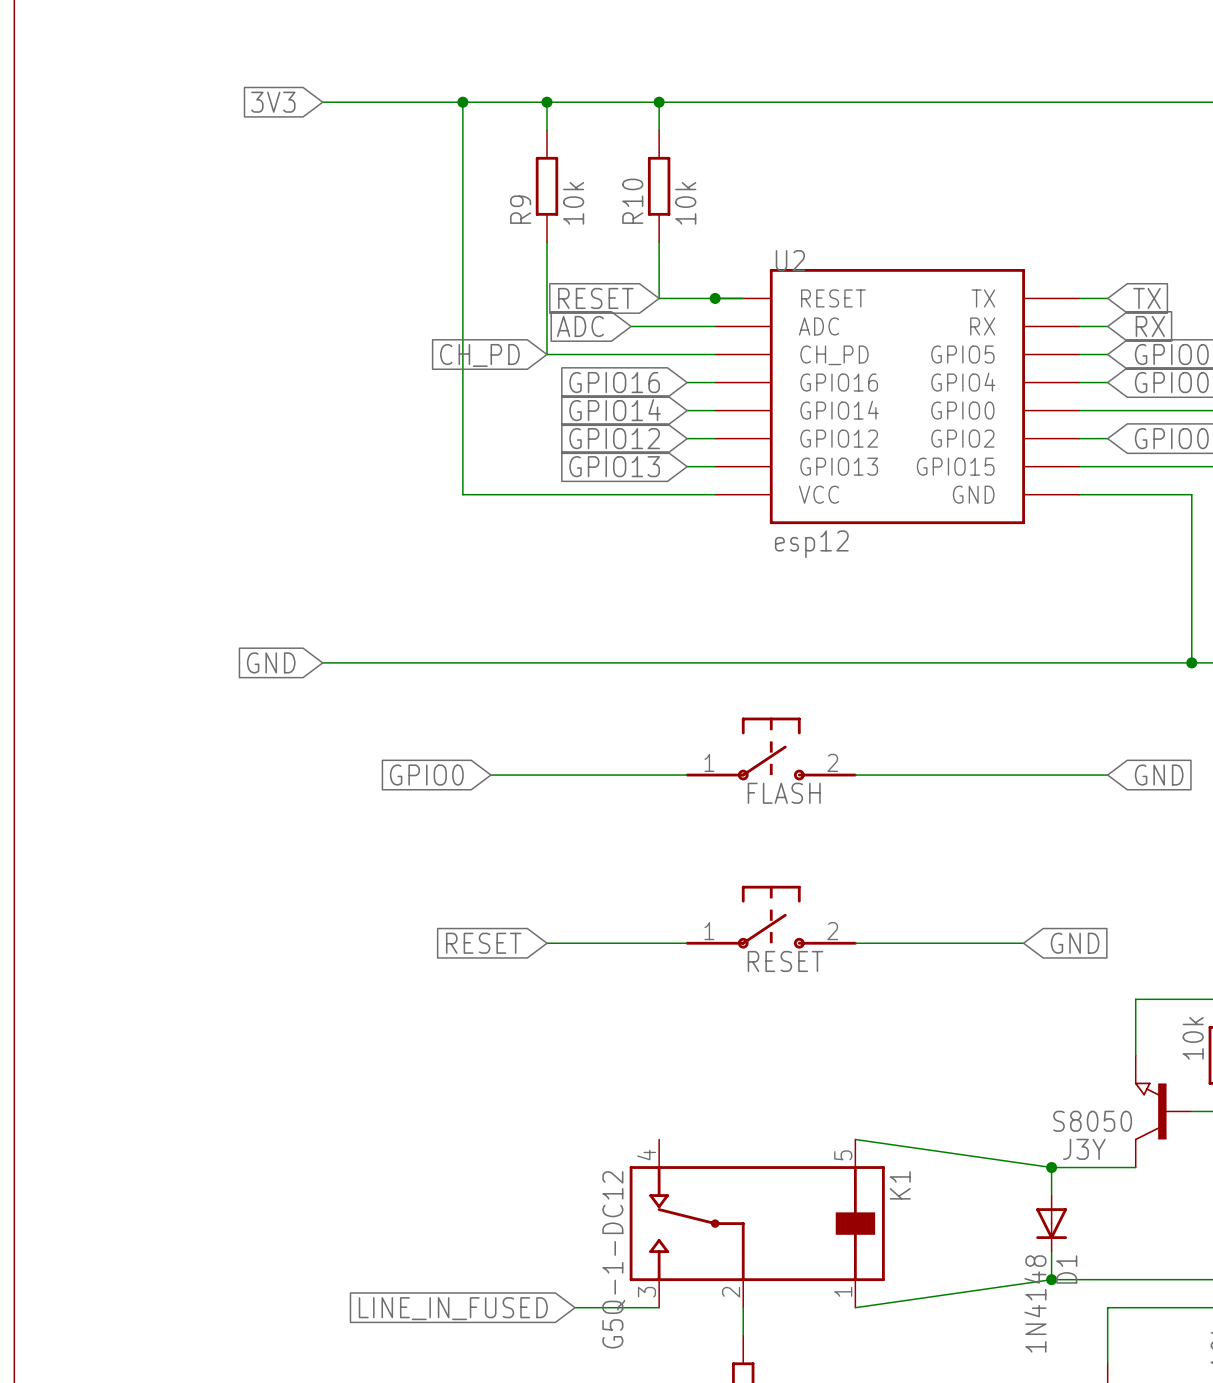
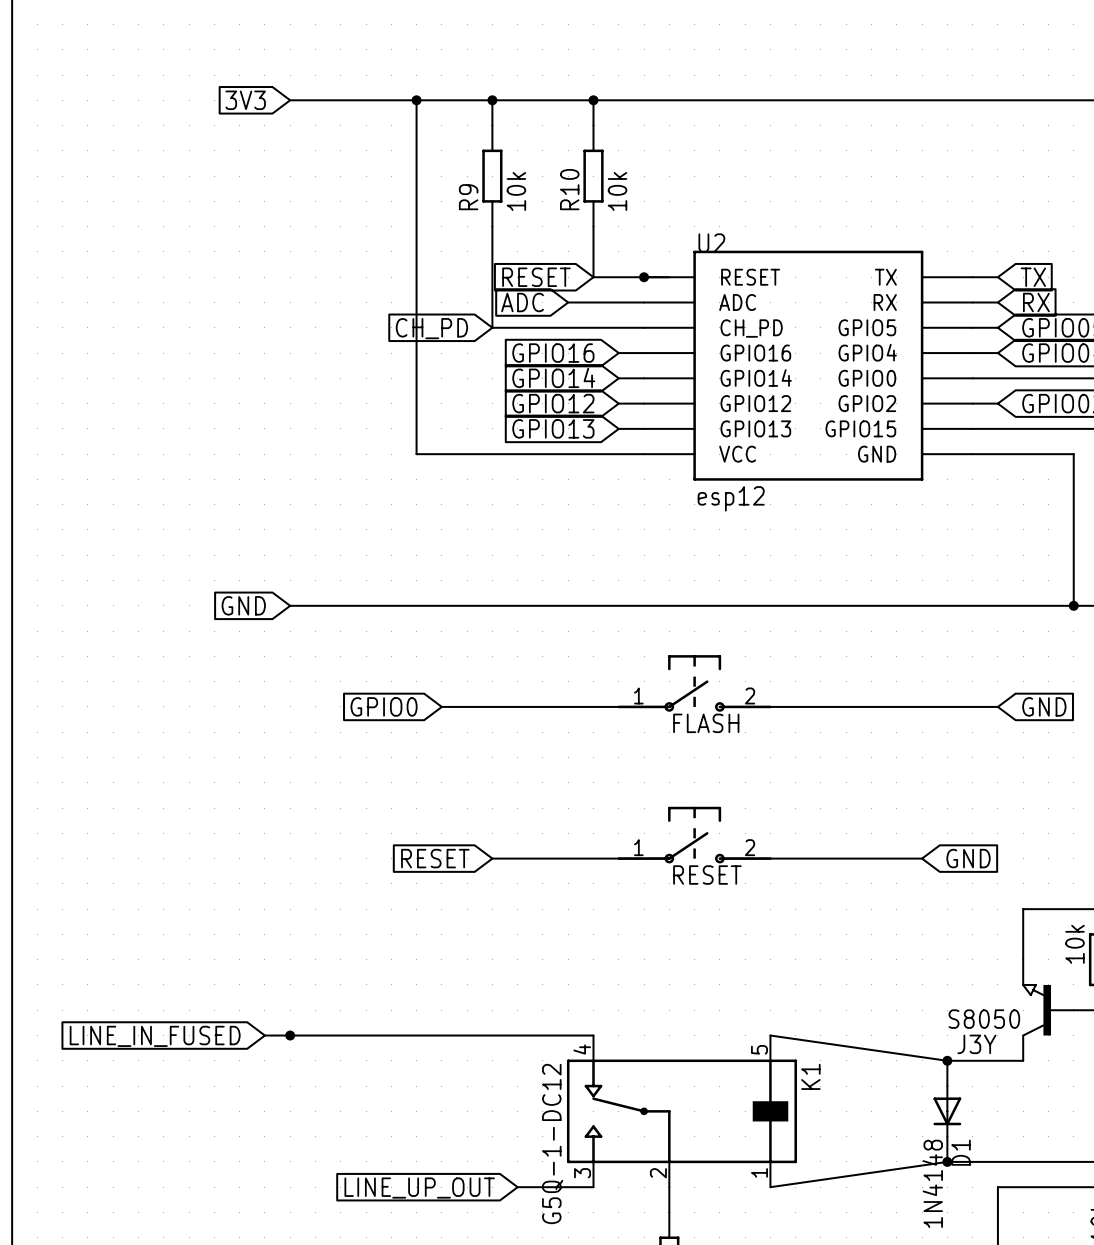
wire: none -> (264, 1035) (593, 1035)
junction: none -> (290, 1035)
global label: none -> LINE_IN_FUSED (155, 1036)
global label: LINE_IN_FUSED (453, 1308) -> LINE_UP_OUT (419, 1188)

